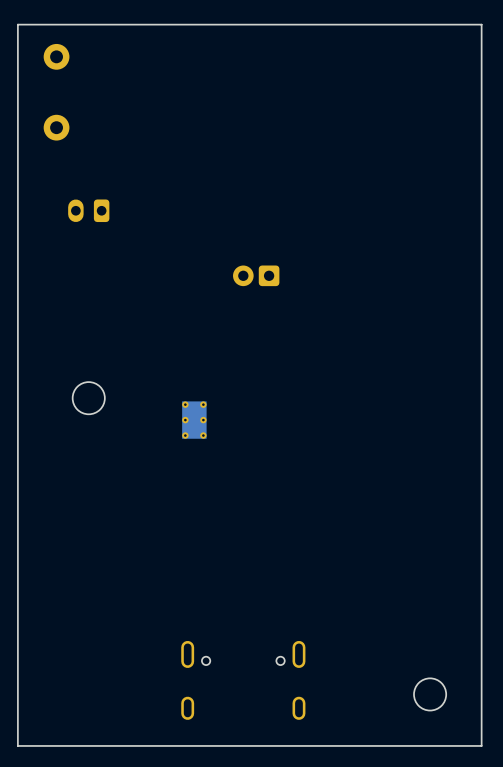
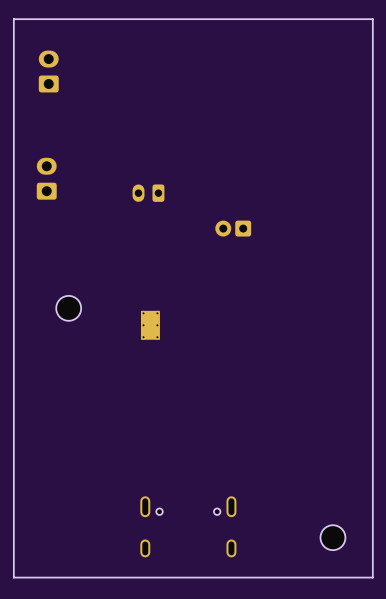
part: (56, 56) -> none
part: none -> (48, 71)
part: (56, 127) -> none
part position: (88, 210) -> (148, 193)
part: none -> (46, 178)
part position: (256, 275) -> (233, 228)

